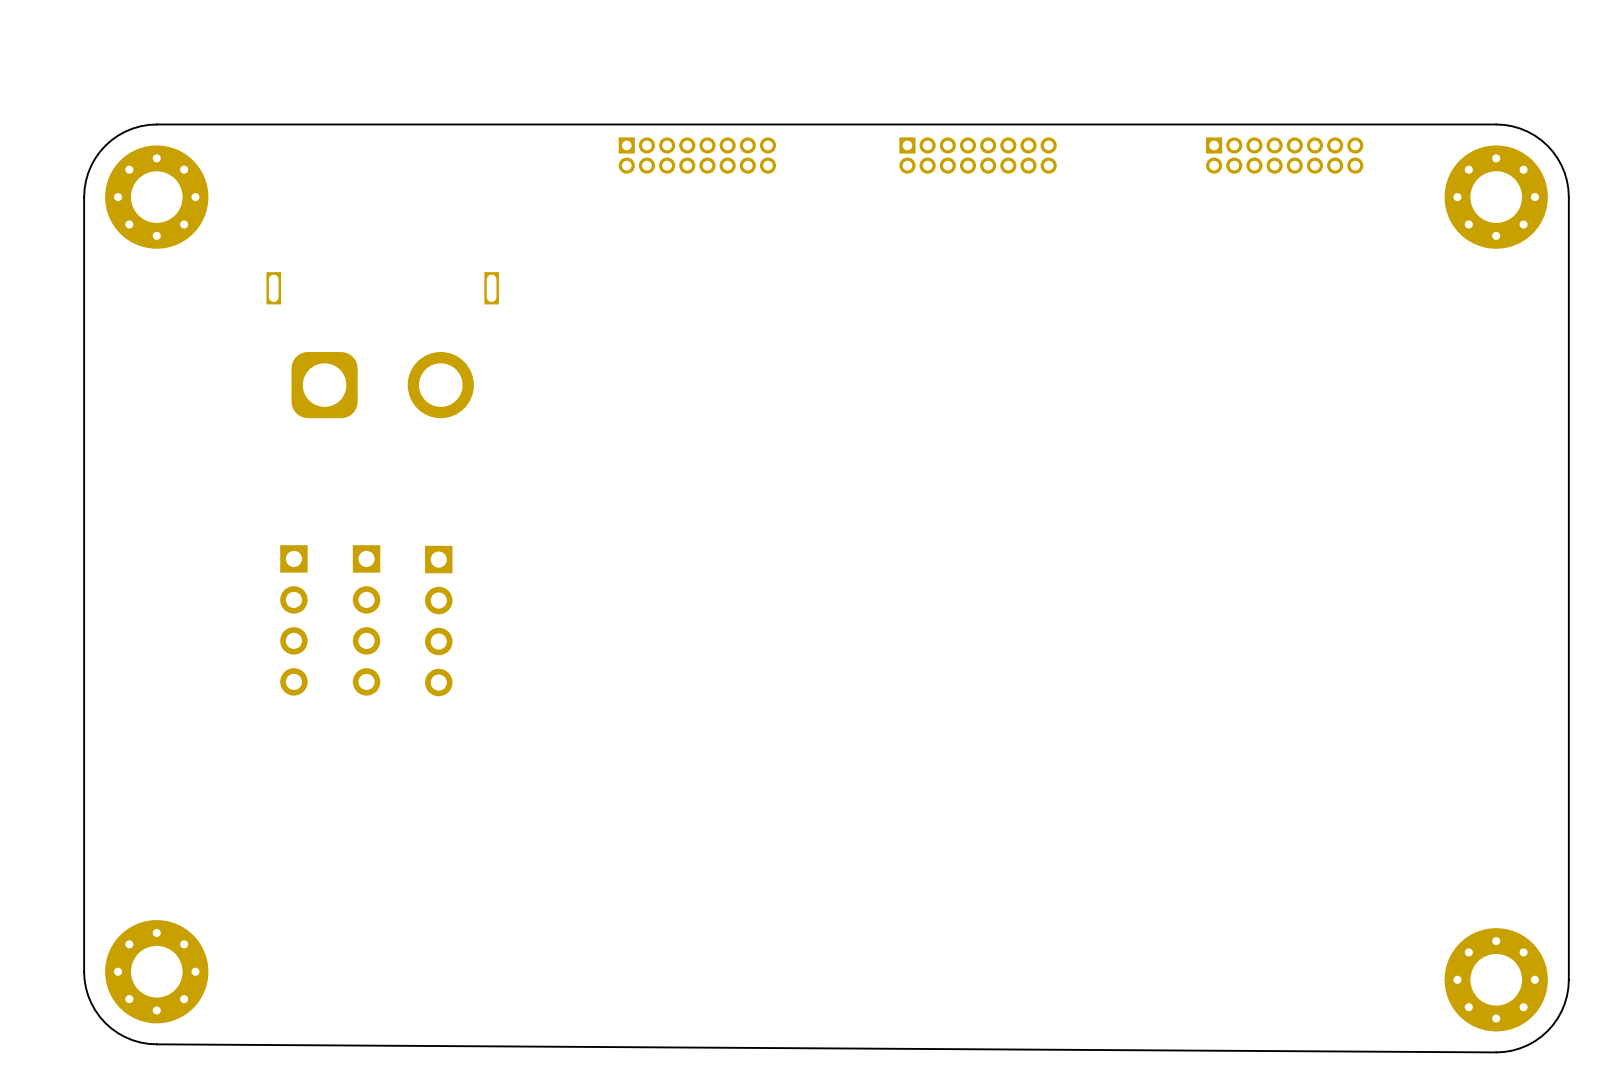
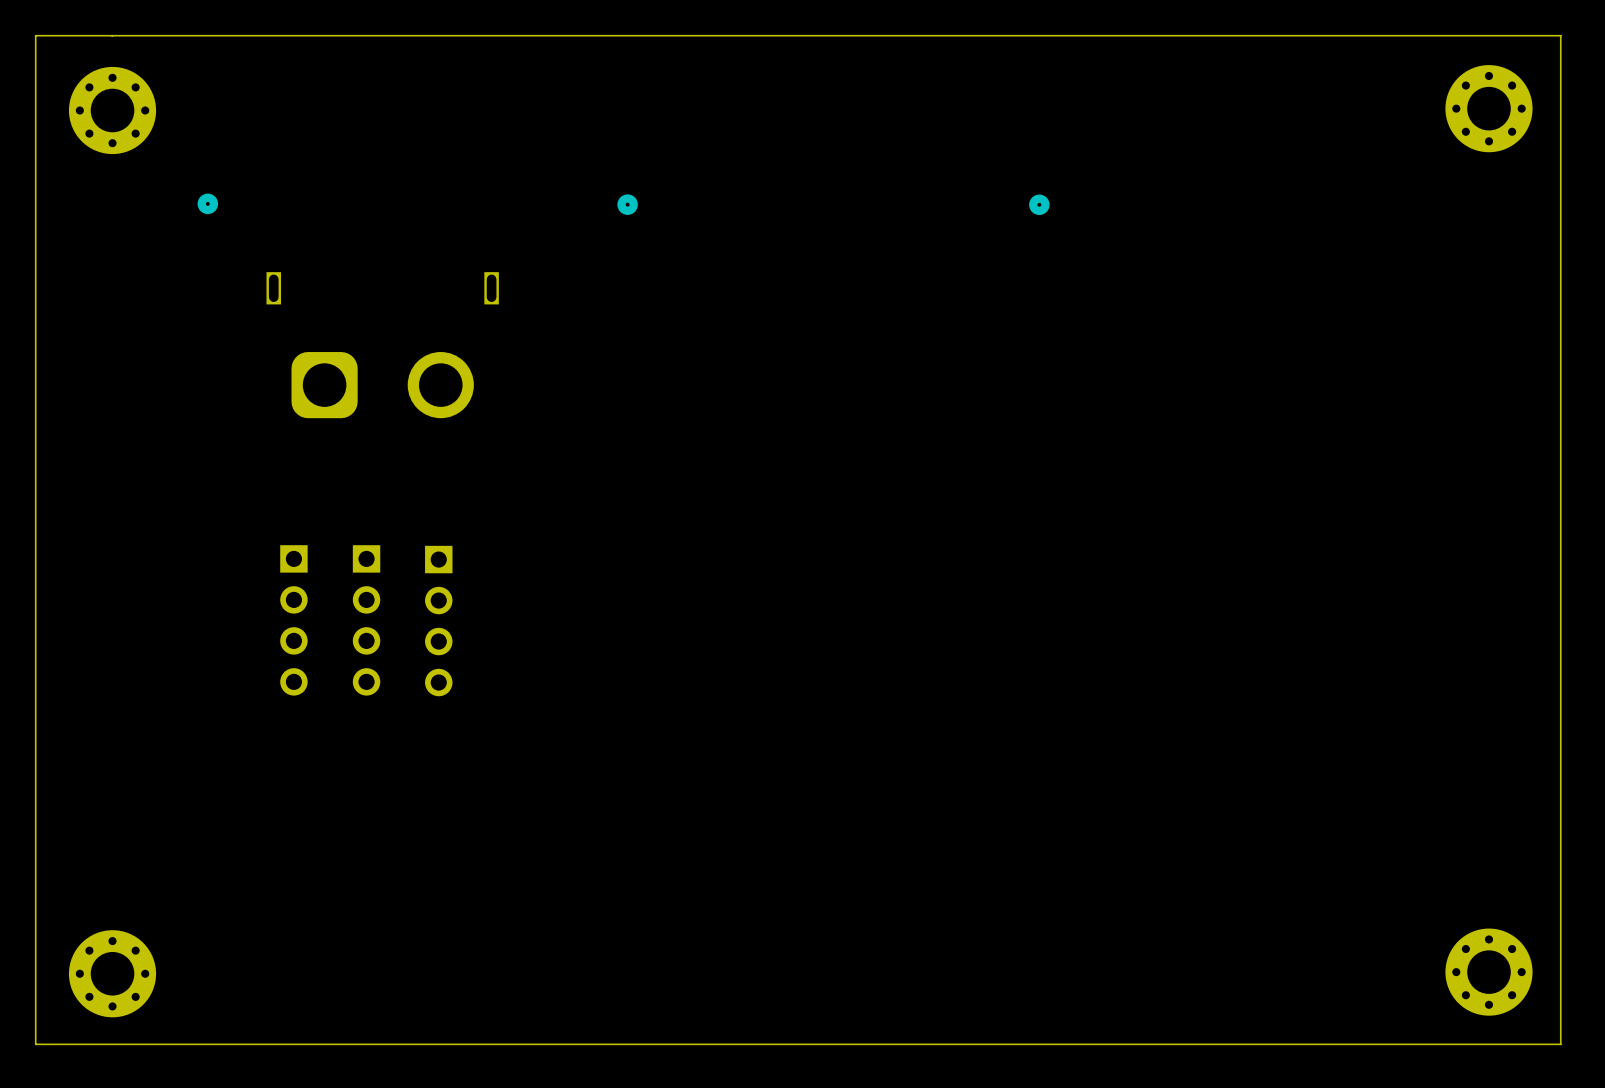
part: none -> (1488, 108)
part: none -> (112, 110)
board edge: (1496, 124) (156, 124) (132, 128) (118, 135) (105, 145) (91, 165) (85, 180) (84, 197) (84, 971) (85, 987) (95, 1010) (105, 1023) (118, 1033) (132, 1040) (156, 1044) (1496, 1052) (1520, 1048) (1534, 1041) (1547, 1031) (1557, 1018) (1564, 1003) (1568, 979) (1568, 197) (1567, 180) (1561, 165) (1547, 145) (1527, 131) (1512, 126) (1496, 124) -> (1560, 35) (1560, 1044) (35, 1044) (35, 35) (1560, 35)
part: (697, 155) -> none
part: (978, 155) -> none
part: (1284, 155) -> none
part: (156, 197) -> none
part: (1496, 197) -> none
part: none -> (207, 203)
part: none -> (627, 204)
part: none -> (1039, 204)
part footprint: [1444, 928, 1548, 1032] -> [1445, 928, 1533, 1016]
part: (156, 971) -> none
part: none -> (112, 973)

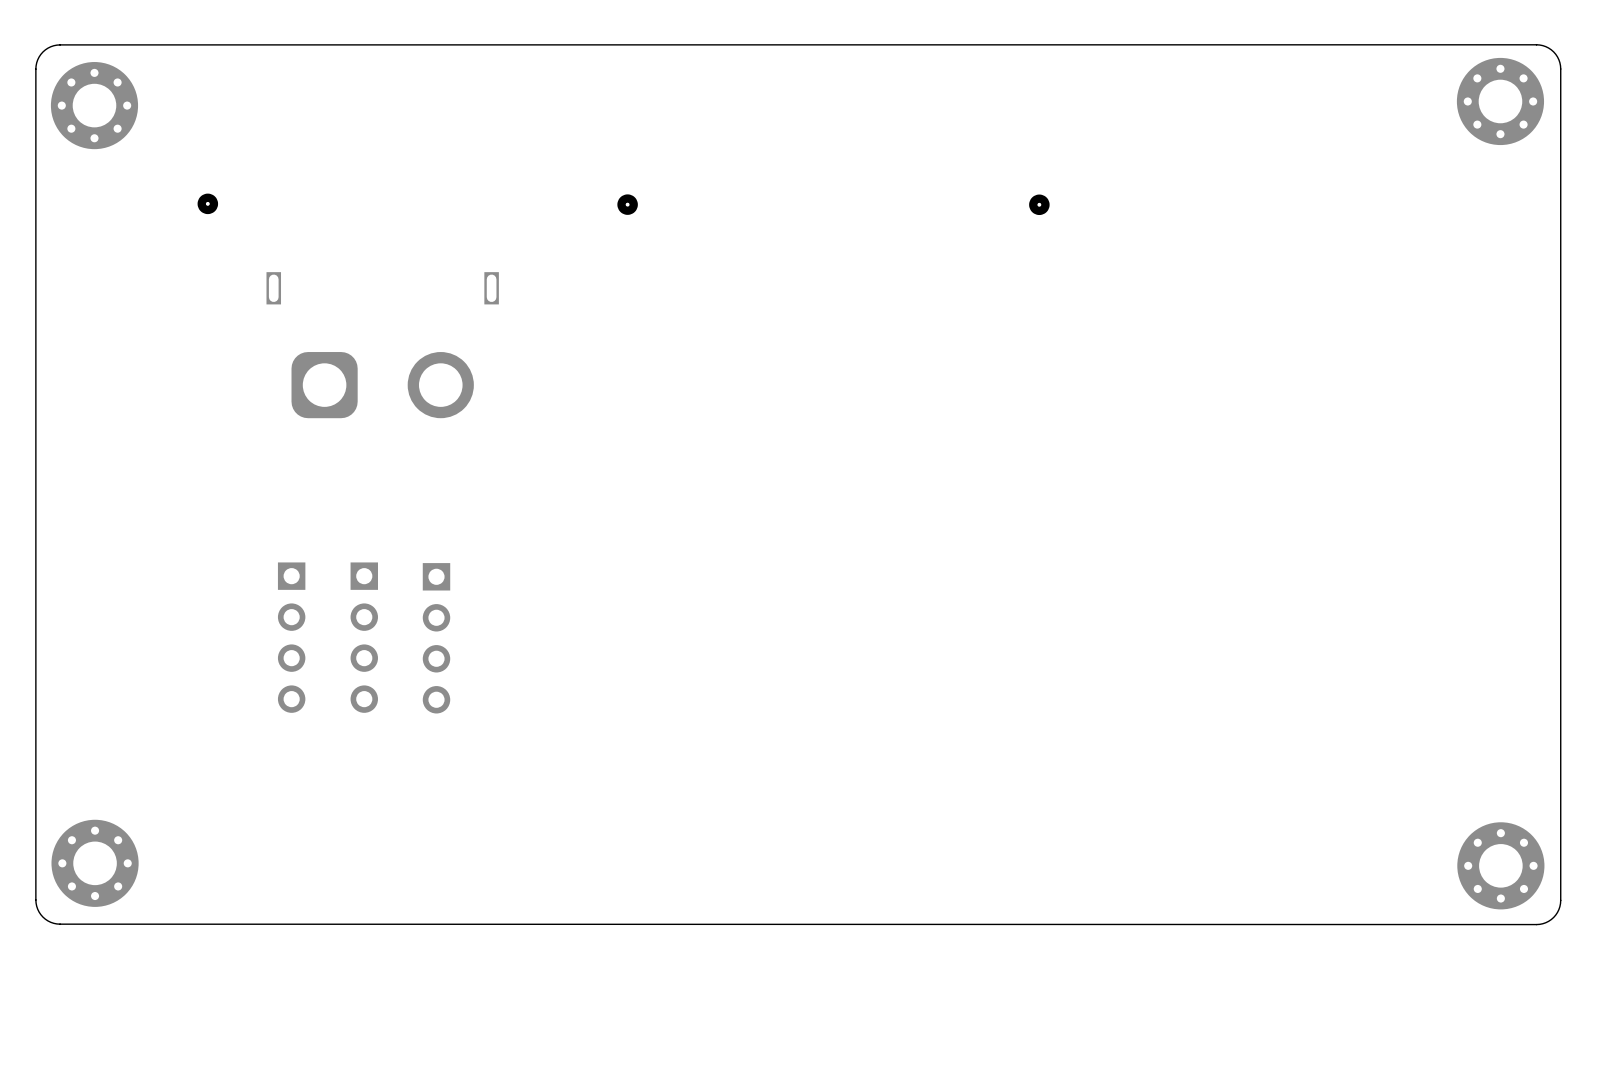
board edge: (1560, 68) (1560, 35) (35, 35) (35, 1044) (1560, 1044) (1560, 900) -> (1560, 68) (1558, 59) (1553, 51) (1545, 46) (1536, 44) (60, 44) (47, 48) (39, 57) (35, 69) (35, 899) (37, 909) (42, 917) (50, 922) (60, 924) (1536, 924) (1545, 922) (1553, 917) (1558, 909) (1560, 900)
part position: (1488, 108) -> (1500, 101)
part position: (112, 110) -> (94, 105)
part position: (293, 620) -> (291, 637)
part position: (366, 620) -> (364, 637)
part position: (438, 621) -> (436, 638)
part position: (1488, 972) -> (1500, 865)
part position: (112, 973) -> (95, 863)

